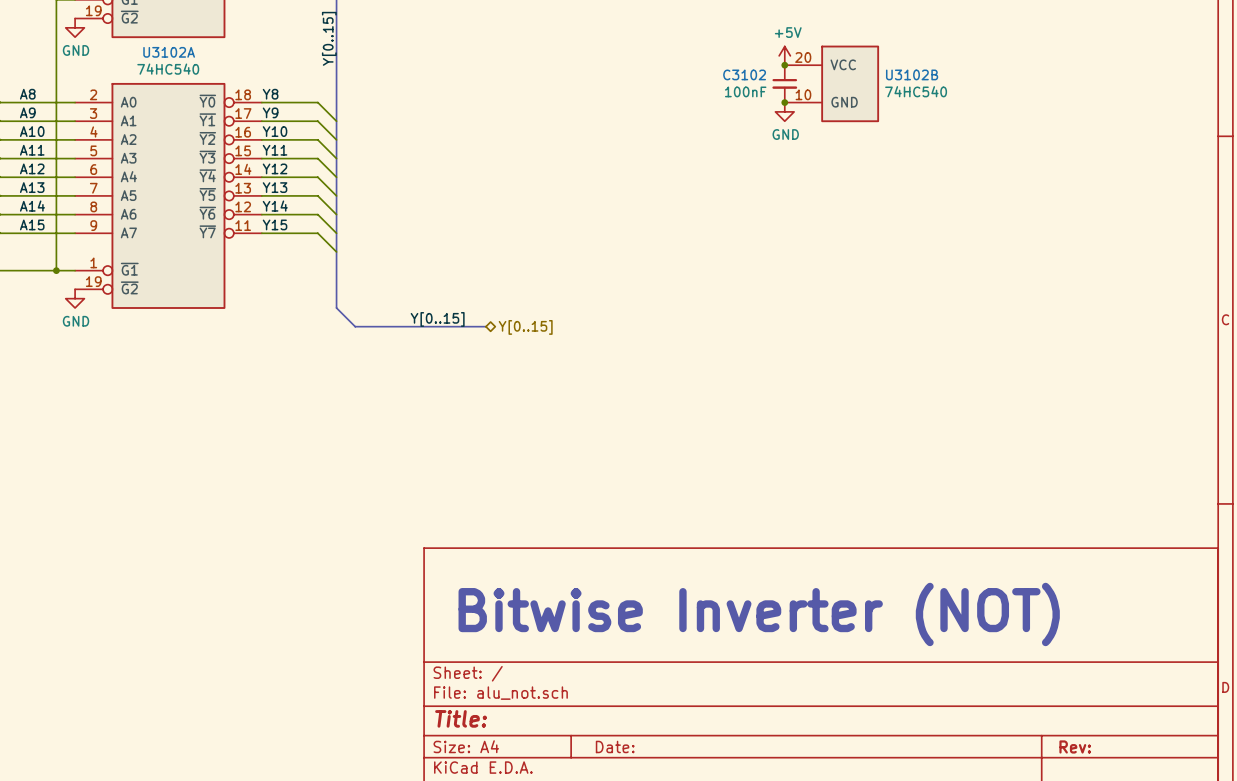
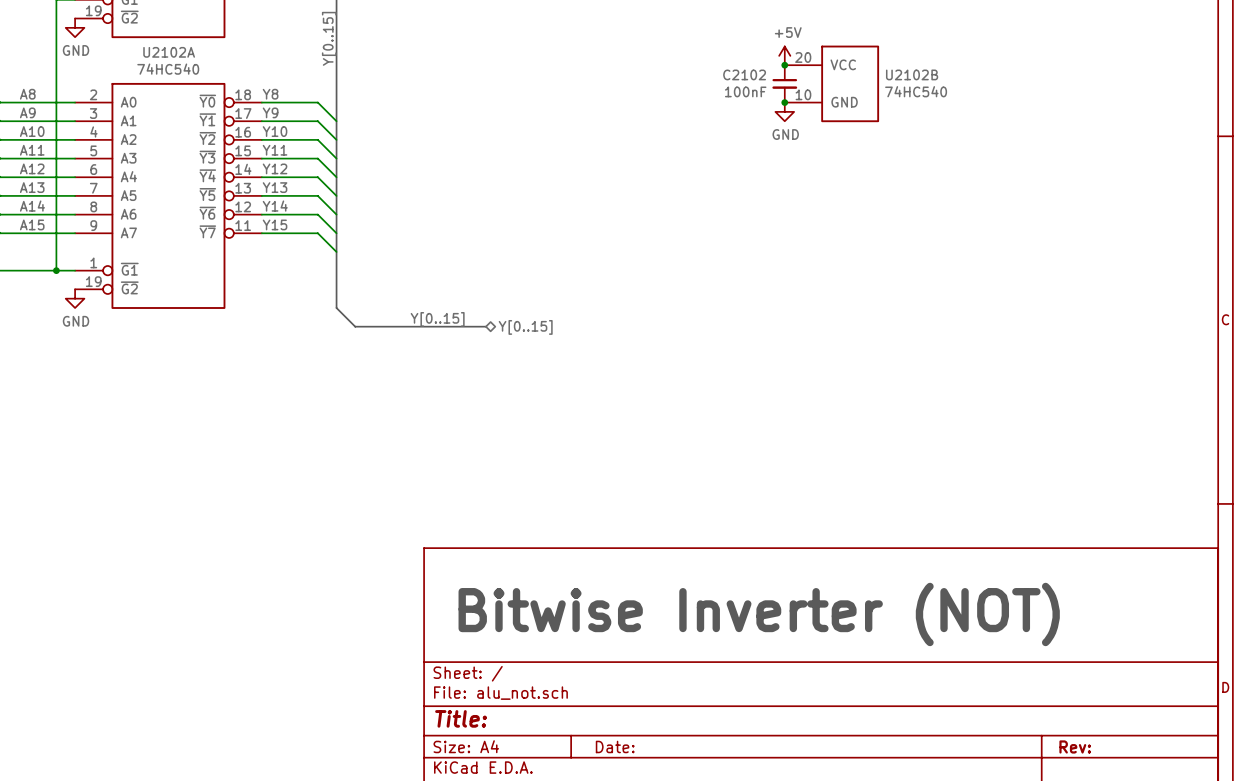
U3102A name: U3102A (169, 52) -> U2102A (169, 52)
C3102 name: C3102 (744, 74) -> C2102 (744, 74)
U3102B name: U3102B (912, 74) -> U2102B (912, 74)

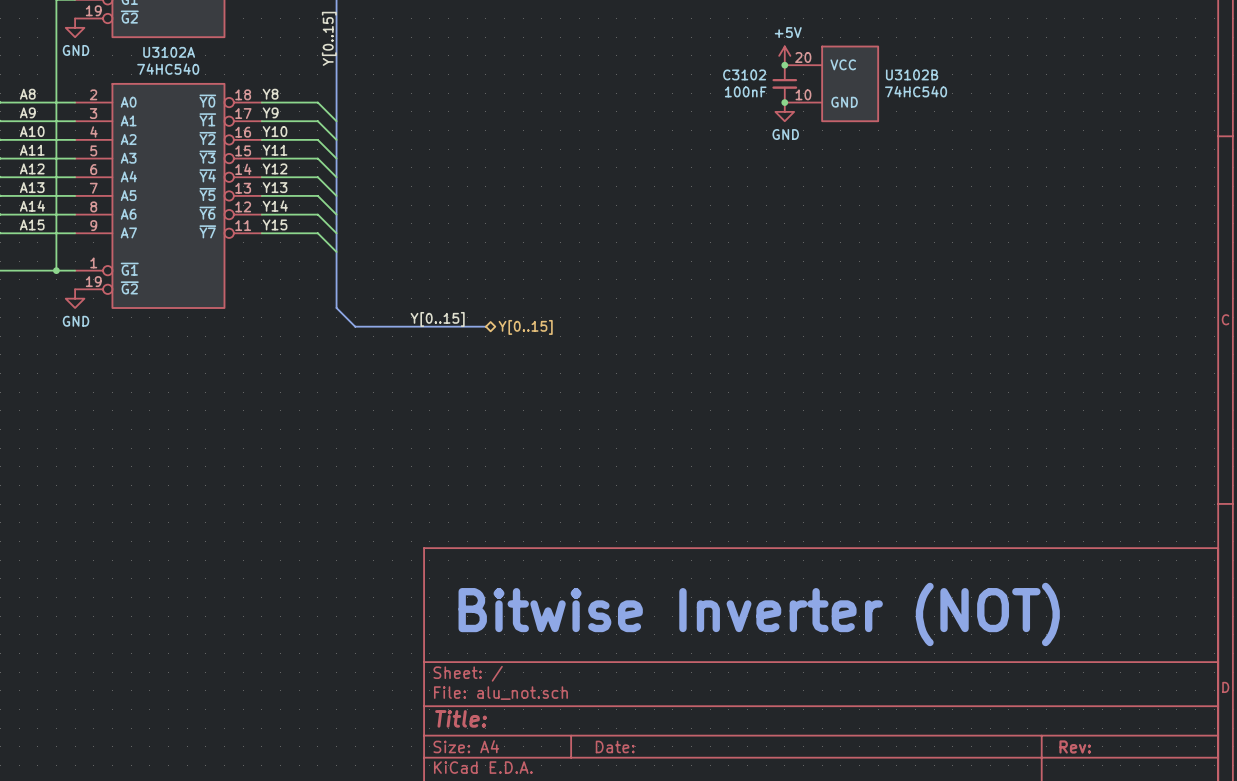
U2102A name: U2102A (169, 52) -> U3102A (169, 52)
C2102 name: C2102 (744, 74) -> C3102 (744, 74)
U2102B name: U2102B (912, 74) -> U3102B (912, 74)

